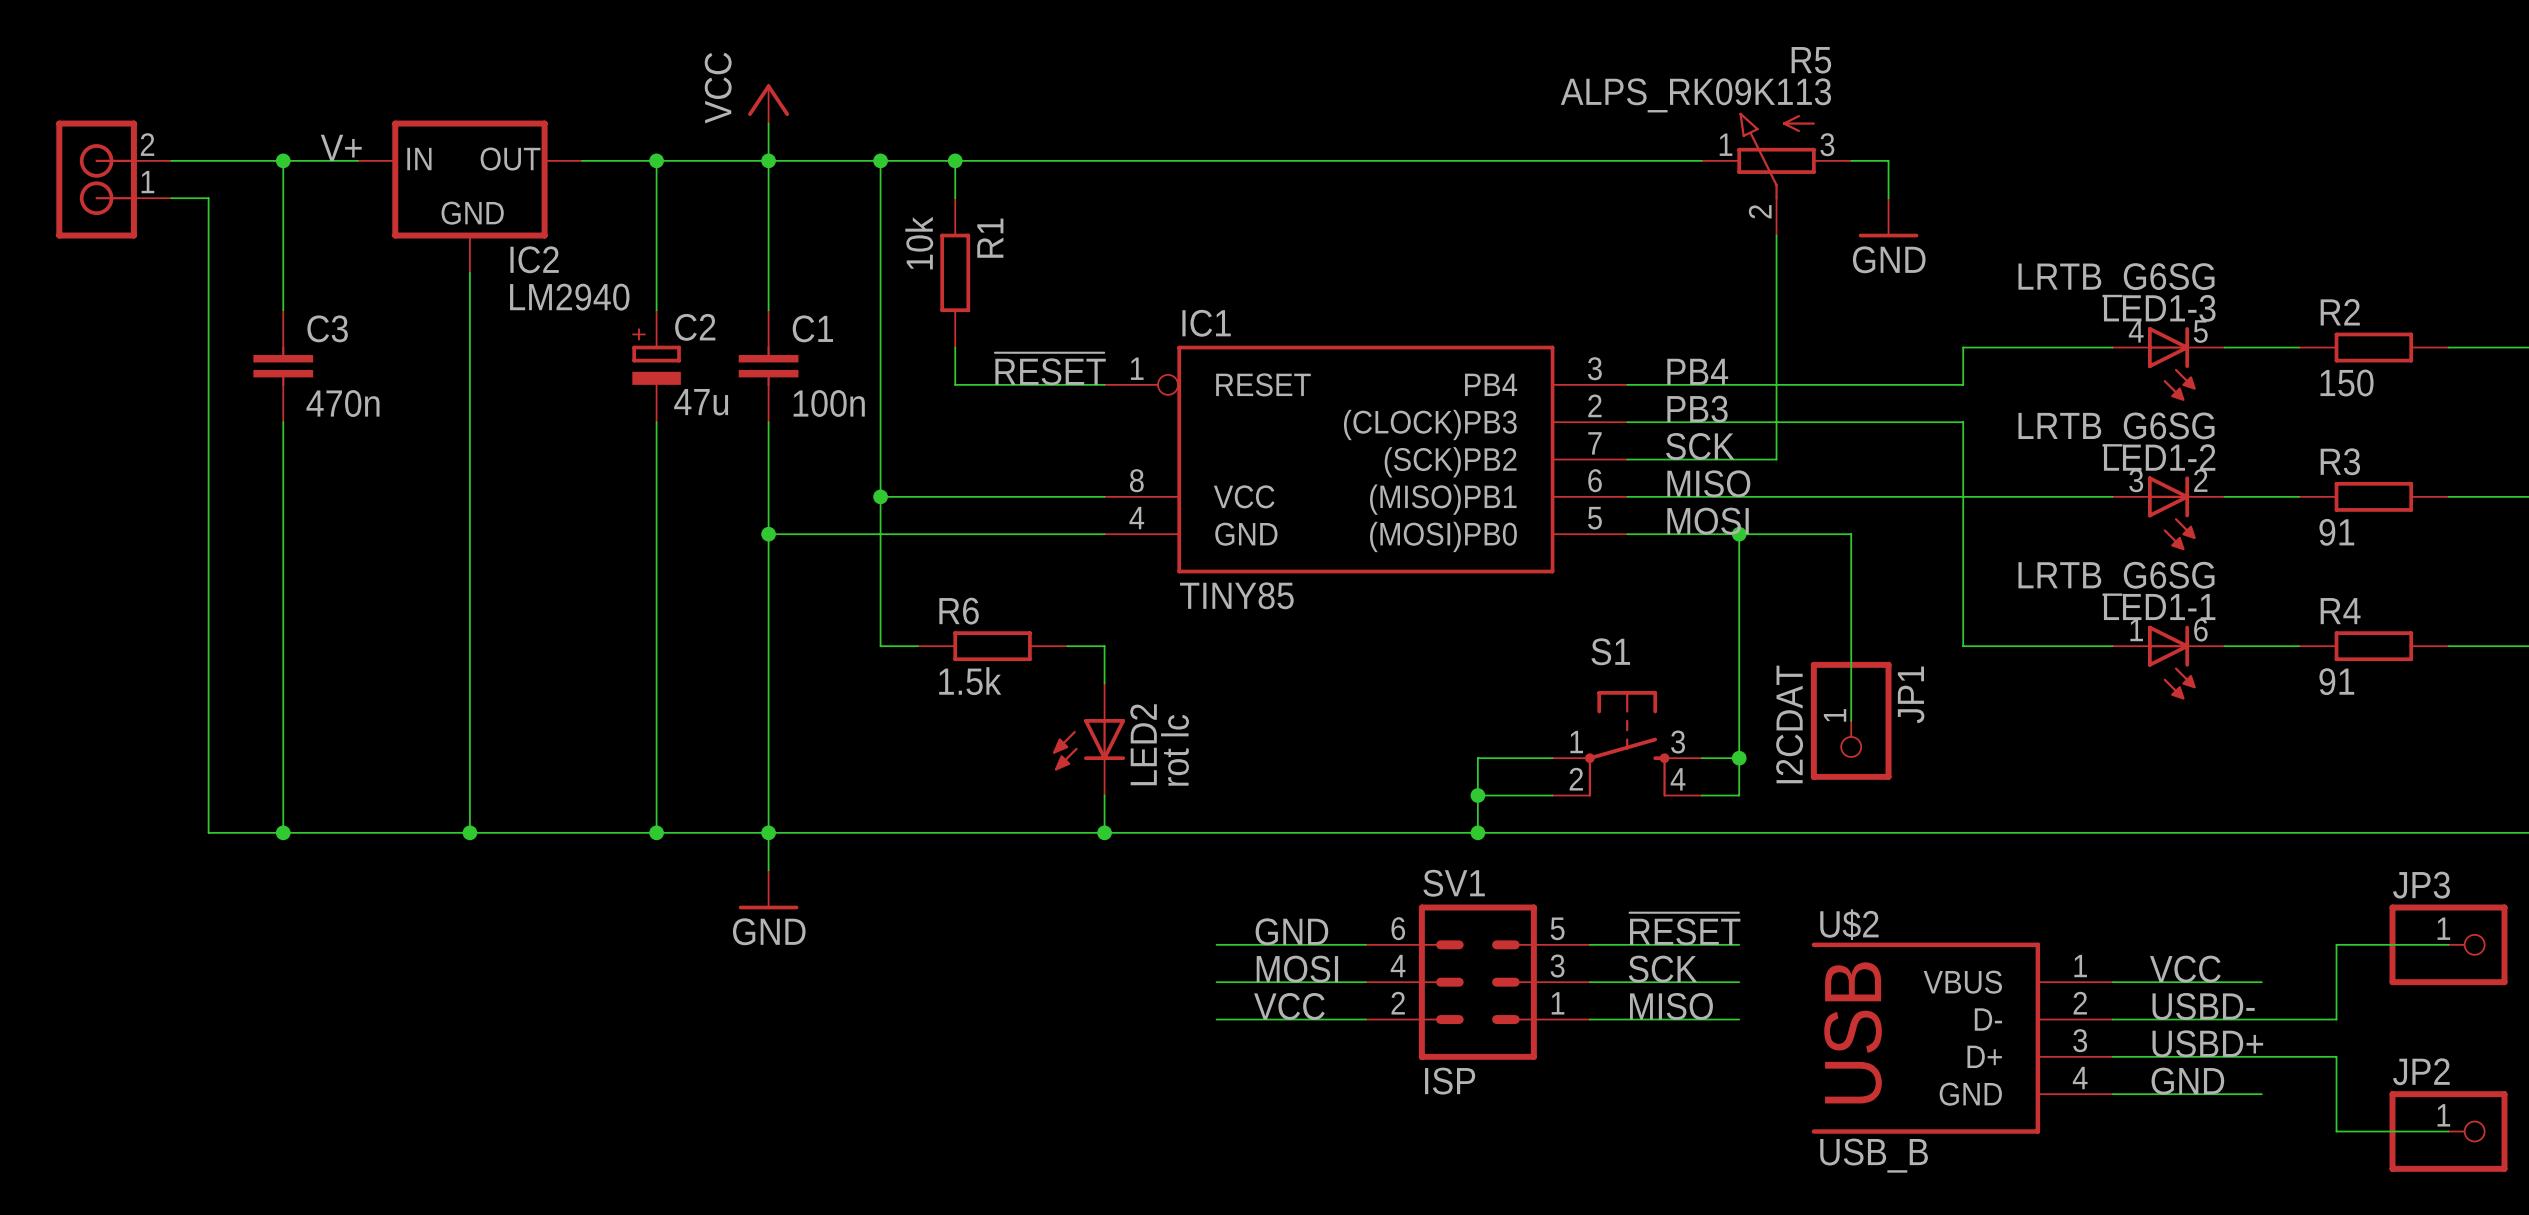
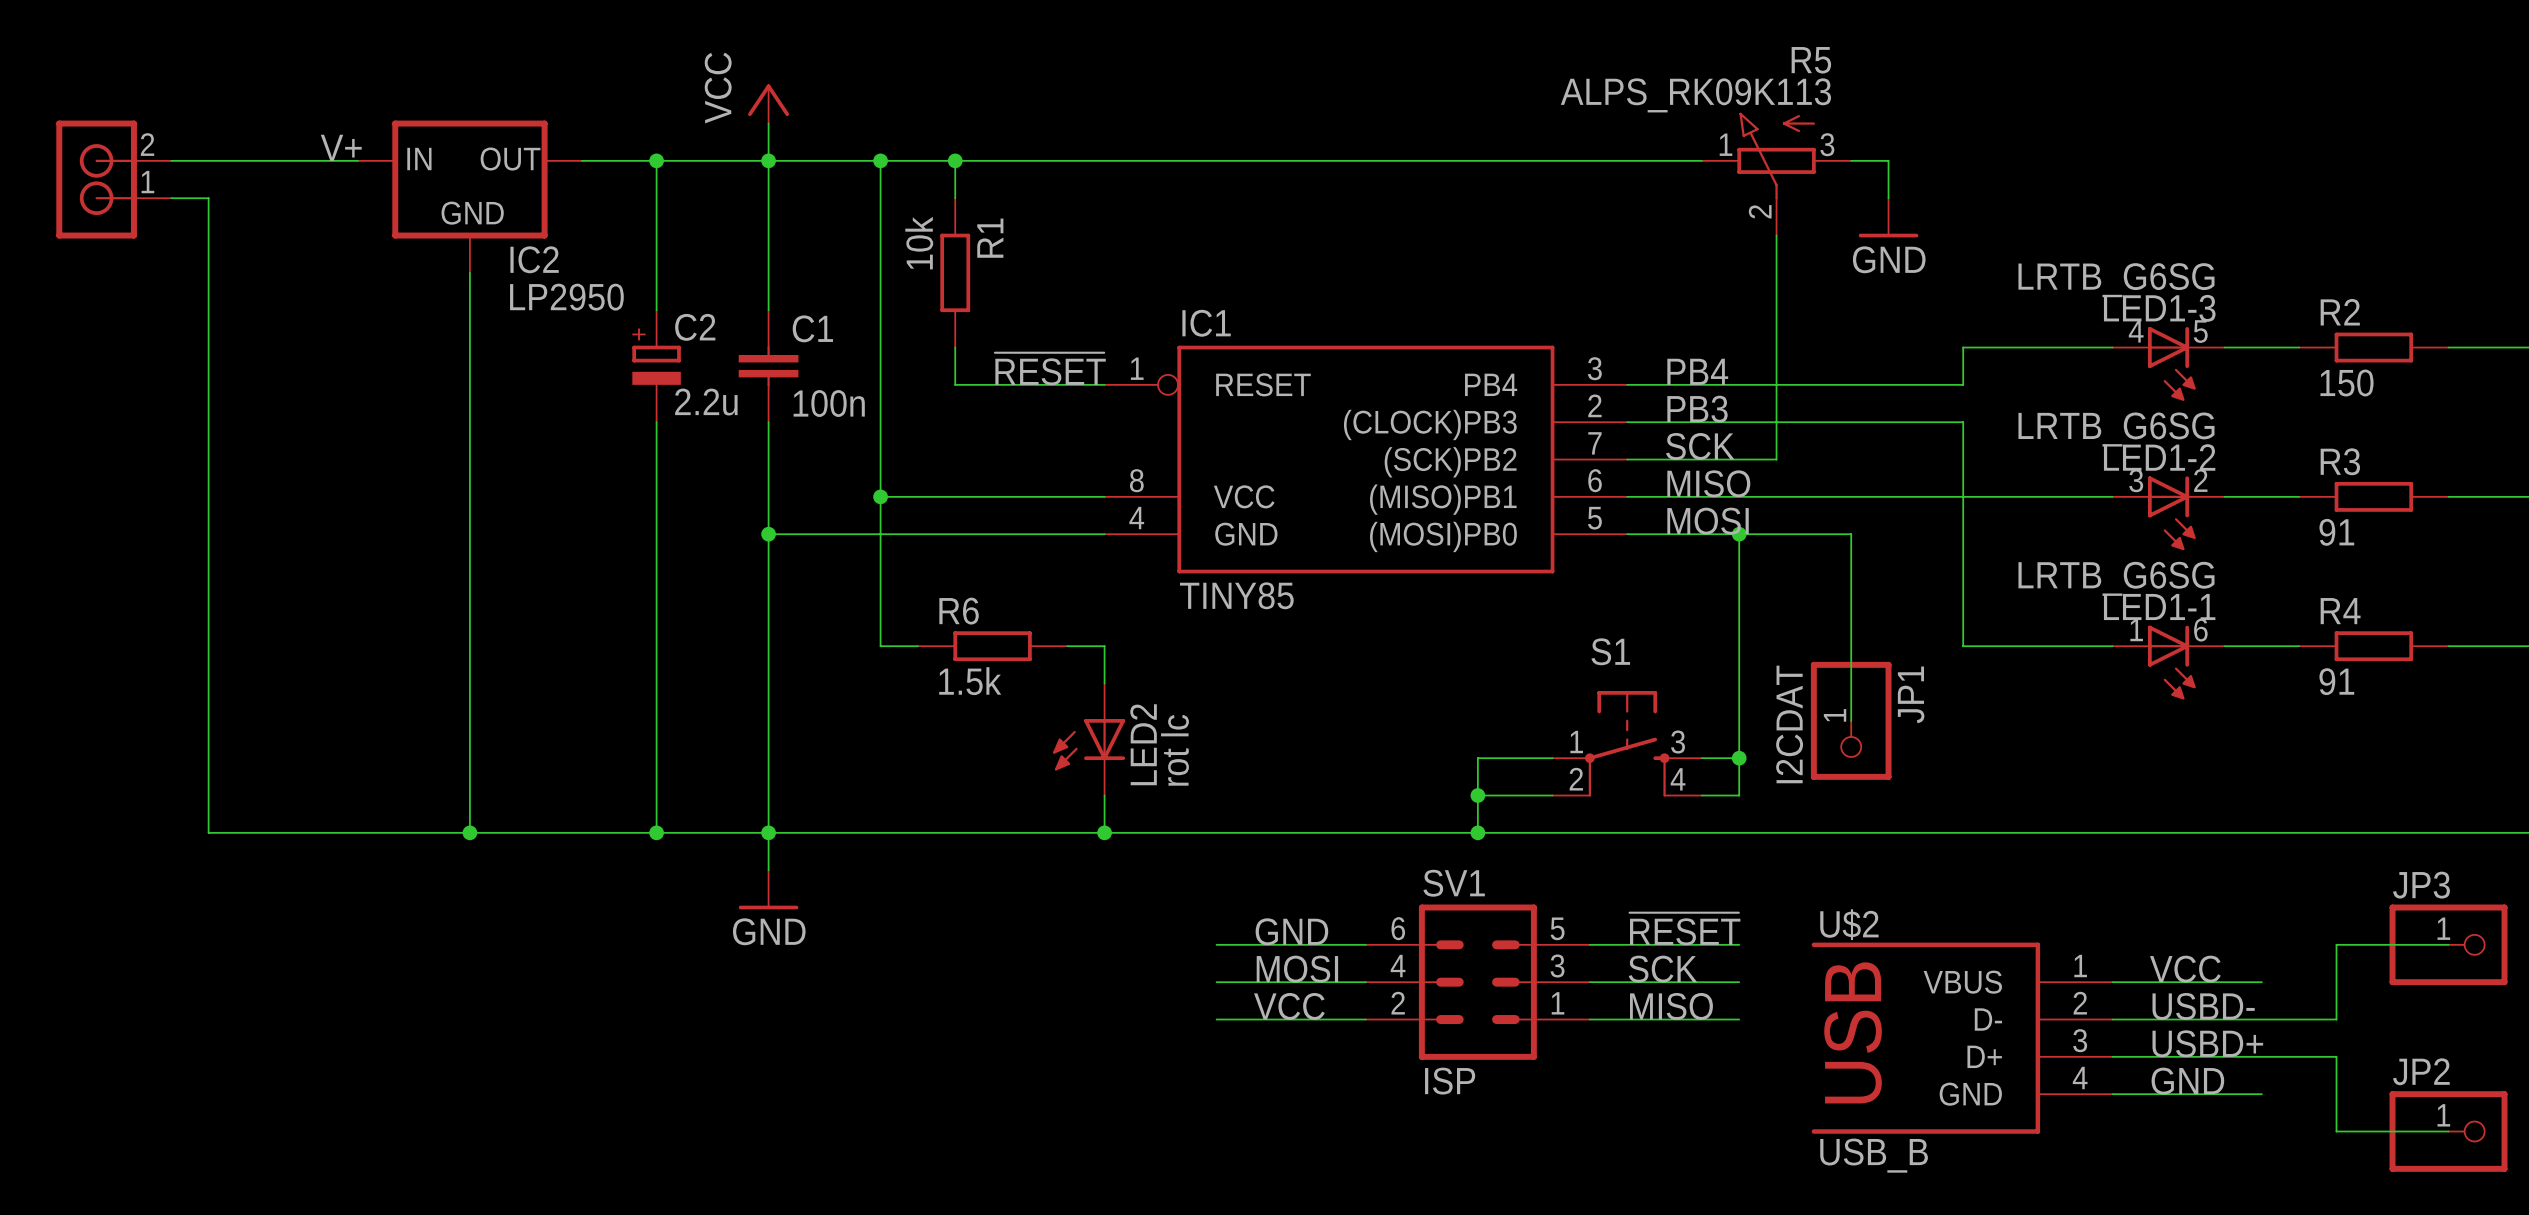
wire: (283, 160) (283, 310) -> none
junction: (283, 160) -> none
IC2 value: LM2940 (569, 297) -> LP2950 (566, 297)
C3: 470n (283, 366) -> none
C2 value: 47u (701, 402) -> 2.2u (706, 402)
wire: (283, 422) (283, 832) -> none
junction: (283, 832) -> none

